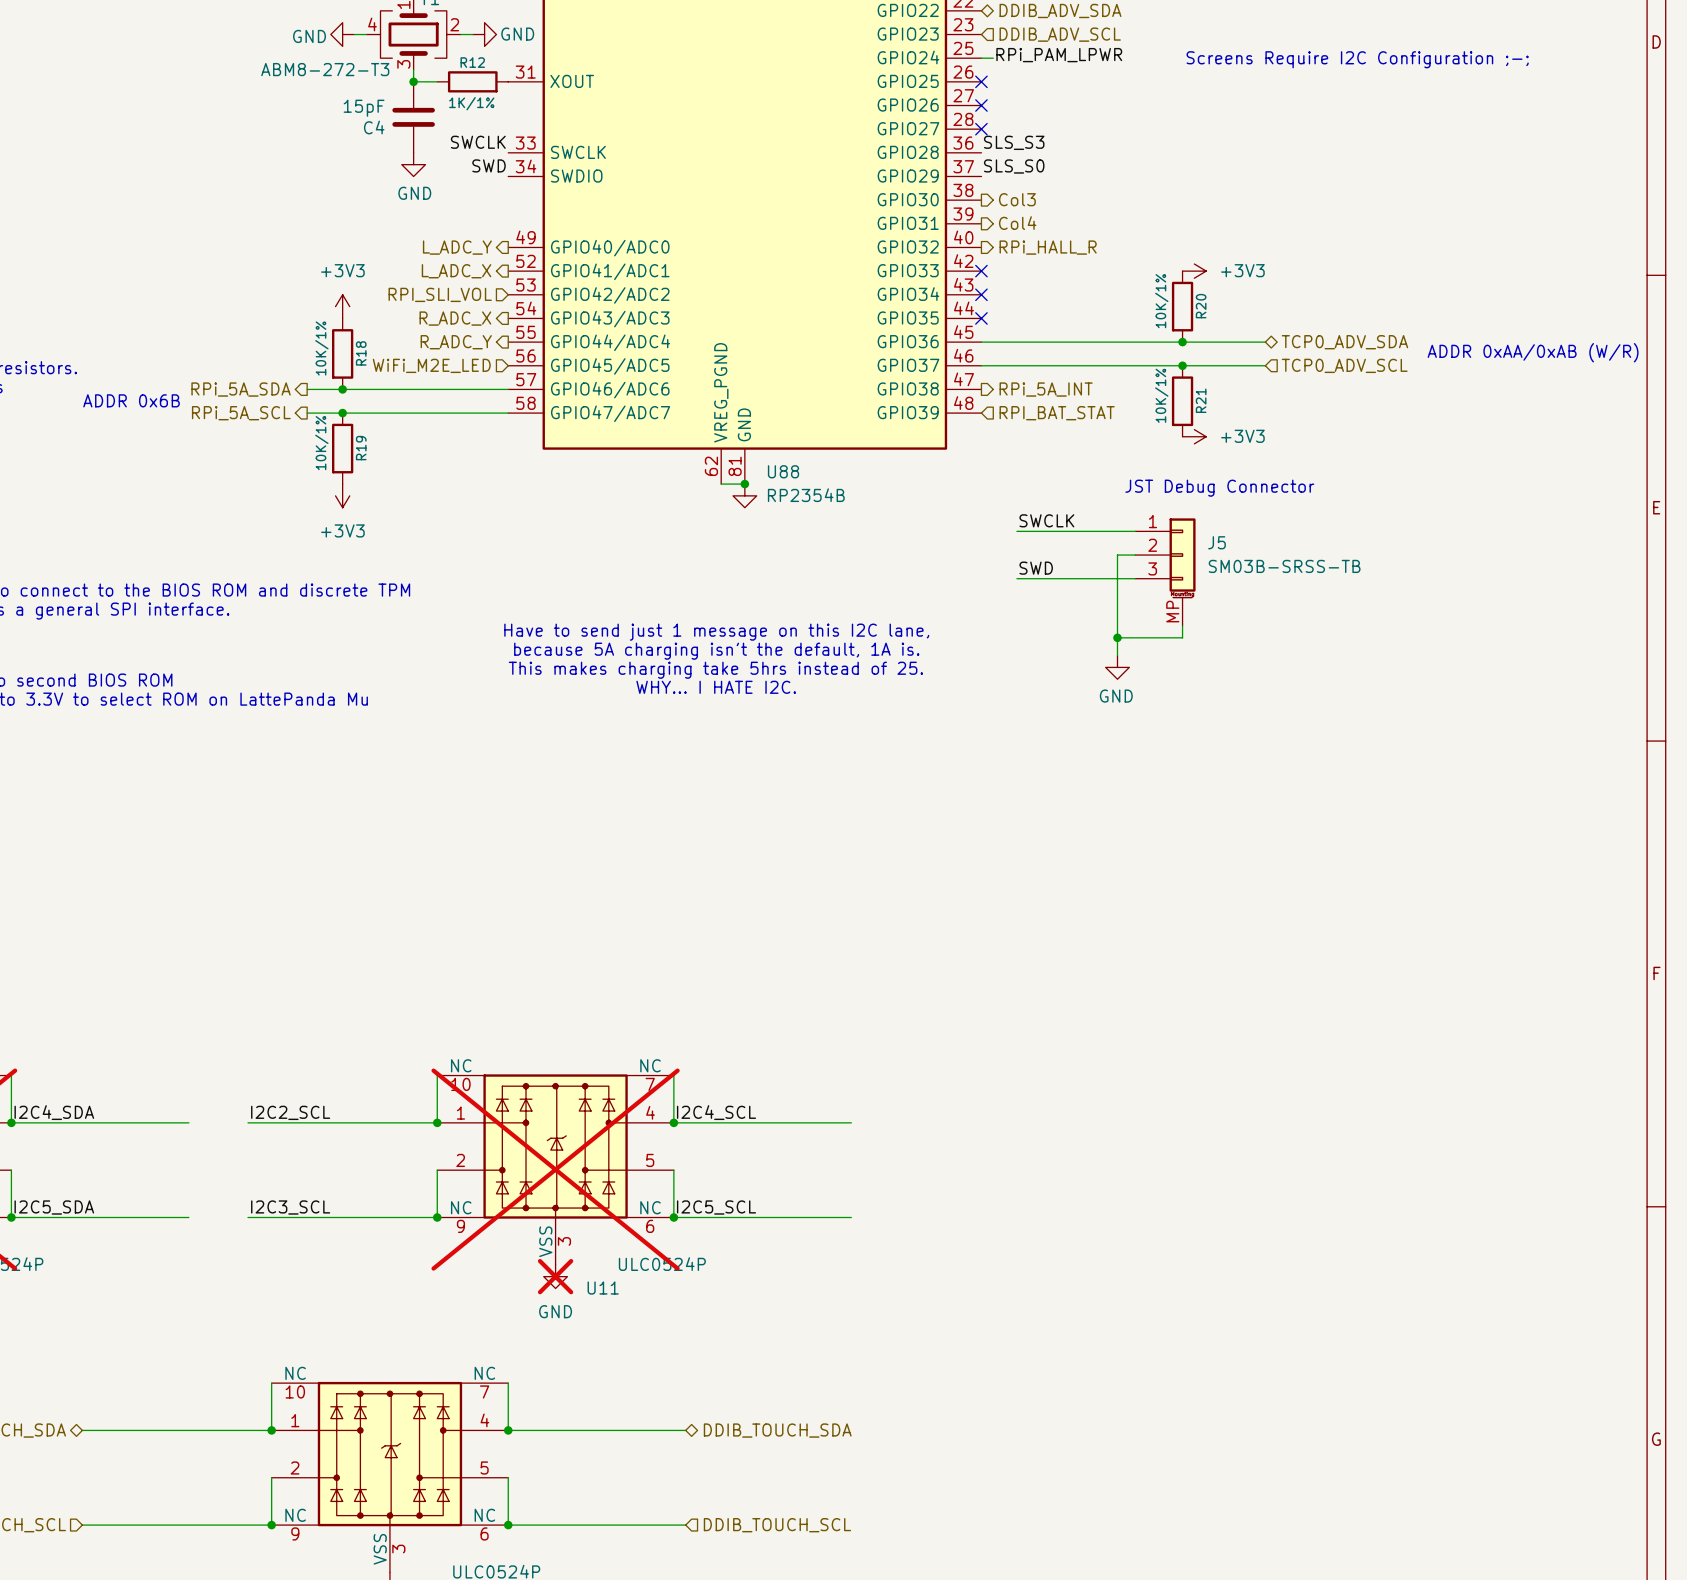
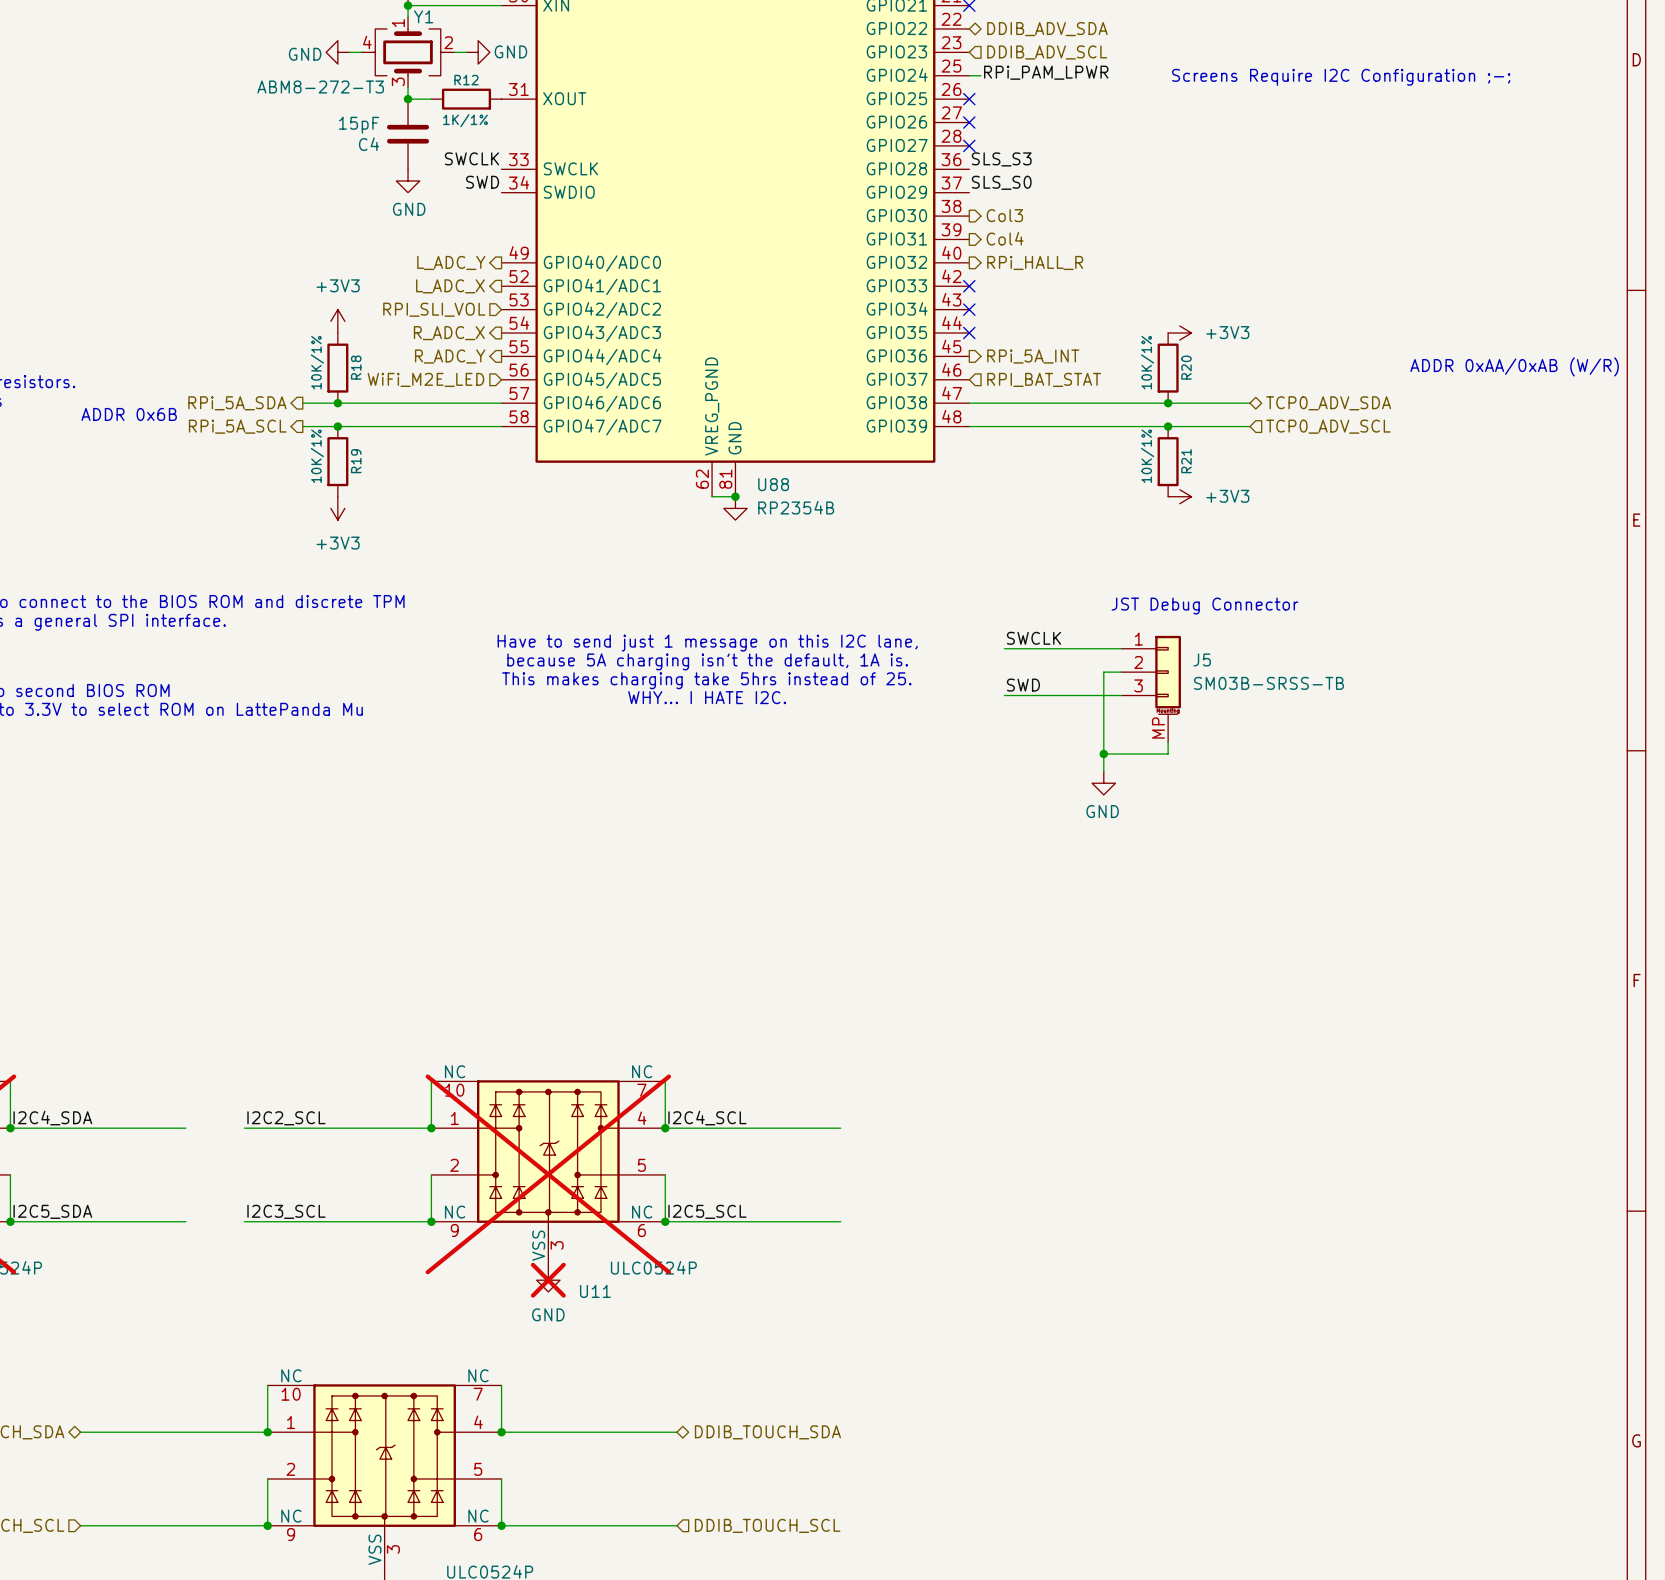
power symbol position: +3V3 (1194, 271) -> +3V3 (1179, 333)
R20 position: (1182, 306) -> (1168, 368)
wire: (981, 342) (1265, 342) -> (969, 403) (1249, 403)
junction: (1182, 342) -> none
hierarchical label position: TCP0_ADV_SDA (1344, 342) -> TCP0_ADV_SDA (1328, 403)
wire: (981, 365) (1265, 365) -> (969, 426) (1249, 426)
junction: (1182, 365) -> none
hierarchical label position: TCP0_ADV_SCL (1344, 365) -> TCP0_ADV_SCL (1328, 426)
hierarchical label position: RPi_5A_INT (1046, 389) -> RPi_5A_INT (1033, 356)
junction: none -> (1168, 403)
R21 position: (1182, 401) -> (1168, 461)
hierarchical label position: RPI_BAT_STAT (1057, 413) -> RPI_BAT_STAT (1044, 379)
junction: none -> (1168, 426)
power symbol position: +3V3 (1194, 436) -> +3V3 (1179, 496)
text position: JST Debug Connector (1219, 488) -> JST Debug Connector (1204, 606)
label position: SWCLK (1046, 520) -> SWCLK (1034, 638)
wire: (1016, 531) (1135, 531) -> none
wire: (1135, 555) (1117, 555) (1117, 655) -> (1121, 672) (1103, 672) (1103, 771)
label position: SWD (1036, 568) -> SWD (1023, 685)
J5 position: (1165, 572) -> (1151, 689)
wire: (1016, 578) (1135, 578) -> (1004, 695) (1121, 695)
wire: none -> (1004, 648) (1103, 648)
junction: (1117, 637) -> none
power symbol position: GND (1117, 667) -> GND (1103, 783)
wire: none -> (1168, 742) (1168, 753) (1103, 753)
junction: none -> (1103, 753)

